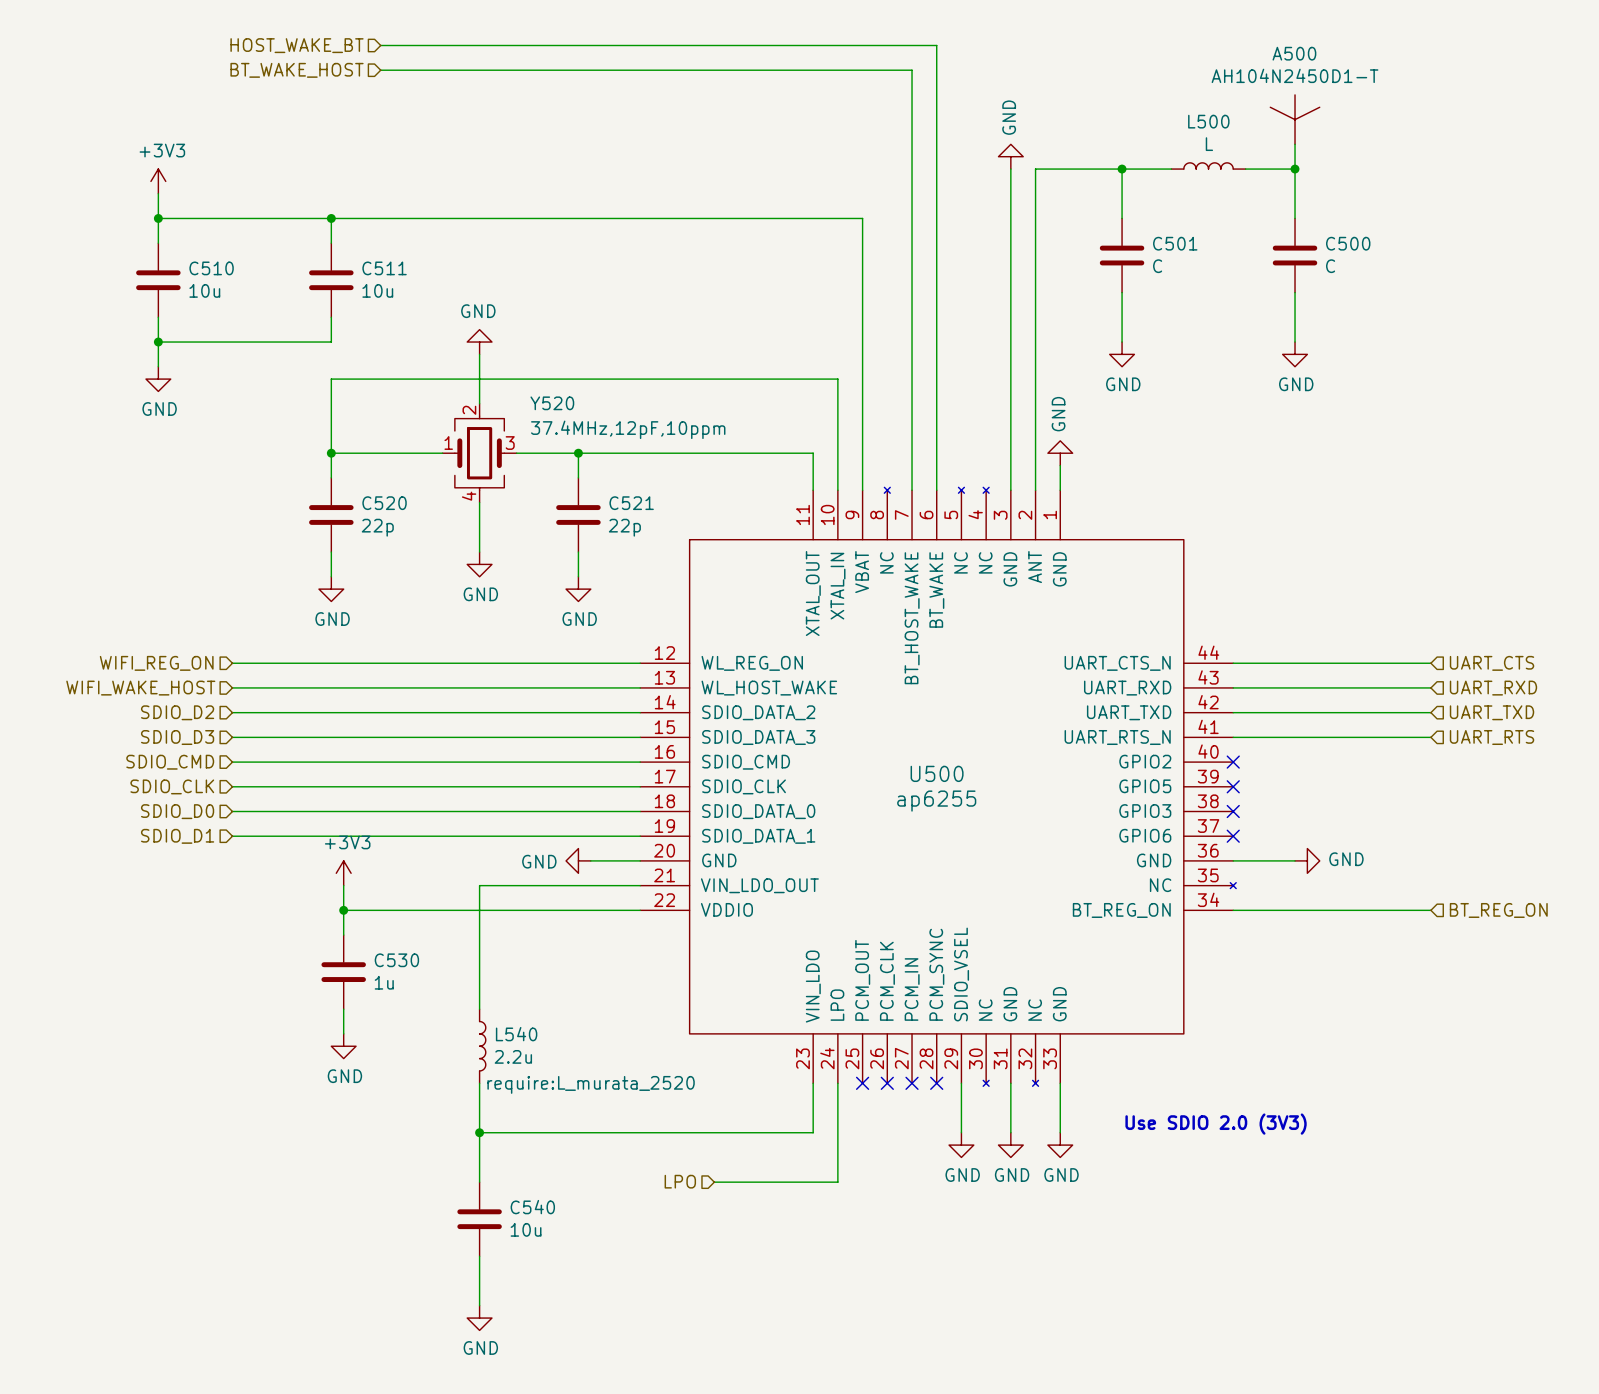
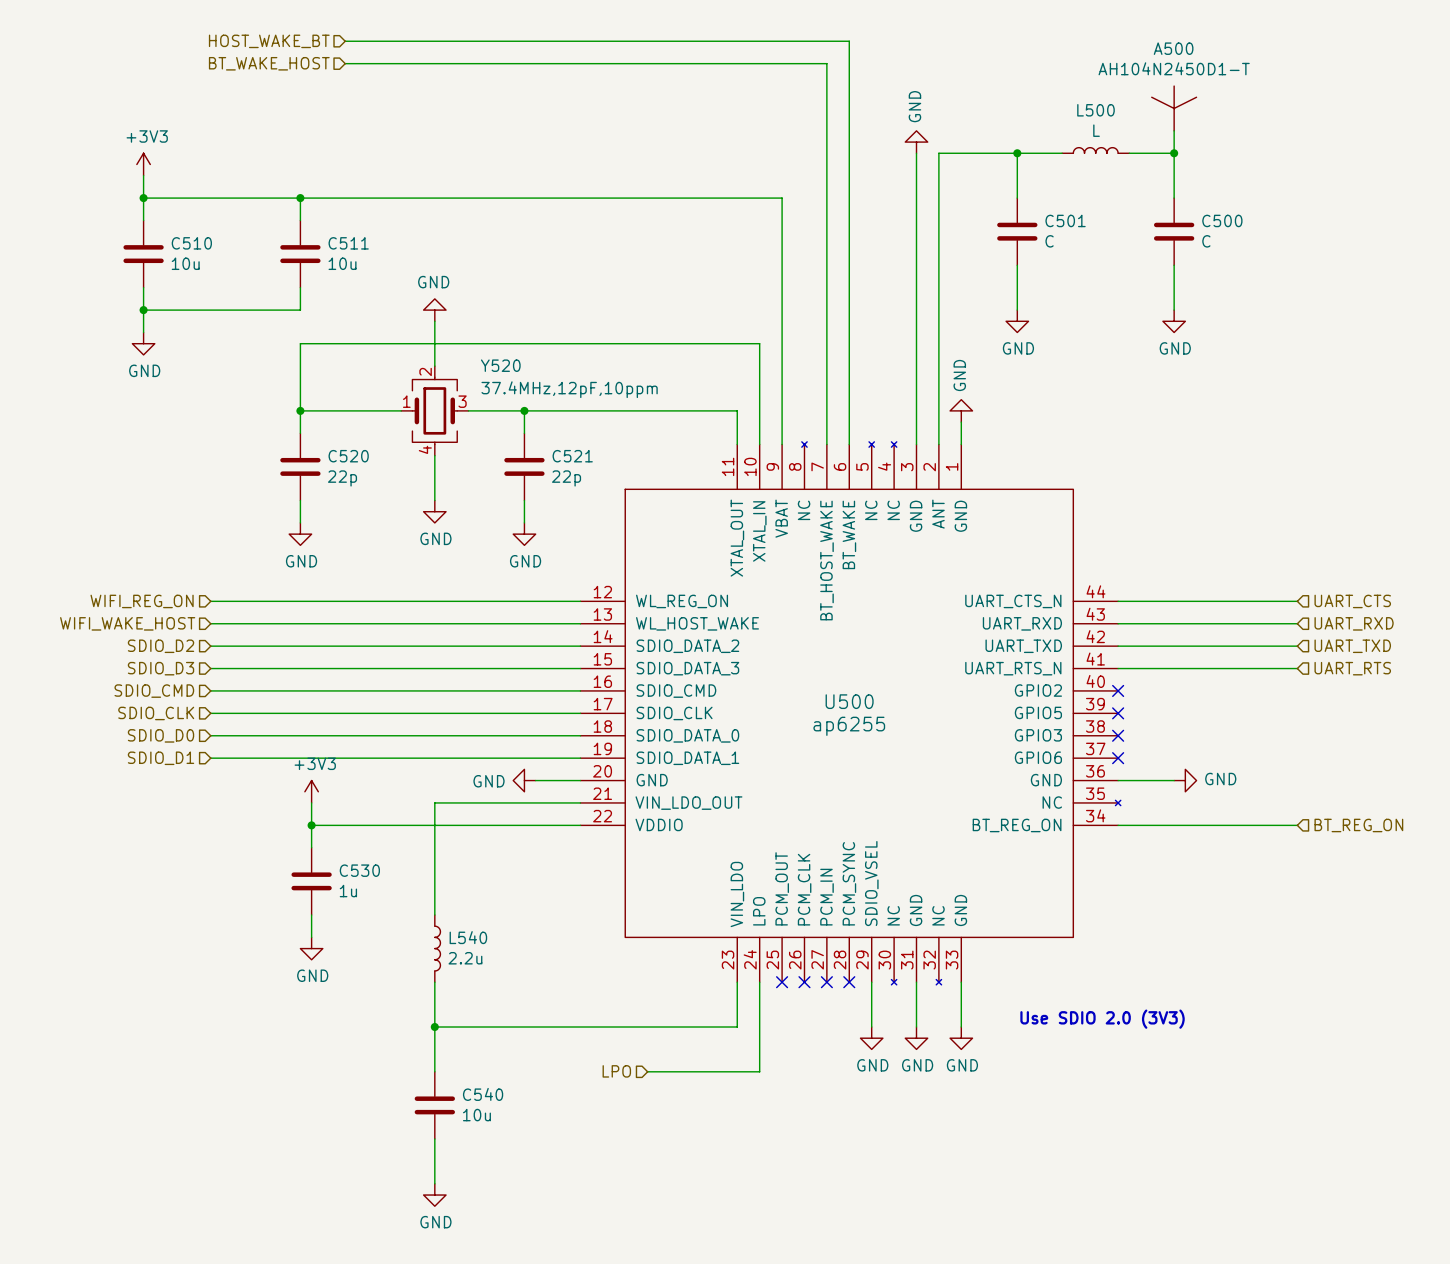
L540 text: require:L_murata_2520 (591, 1084) -> none

